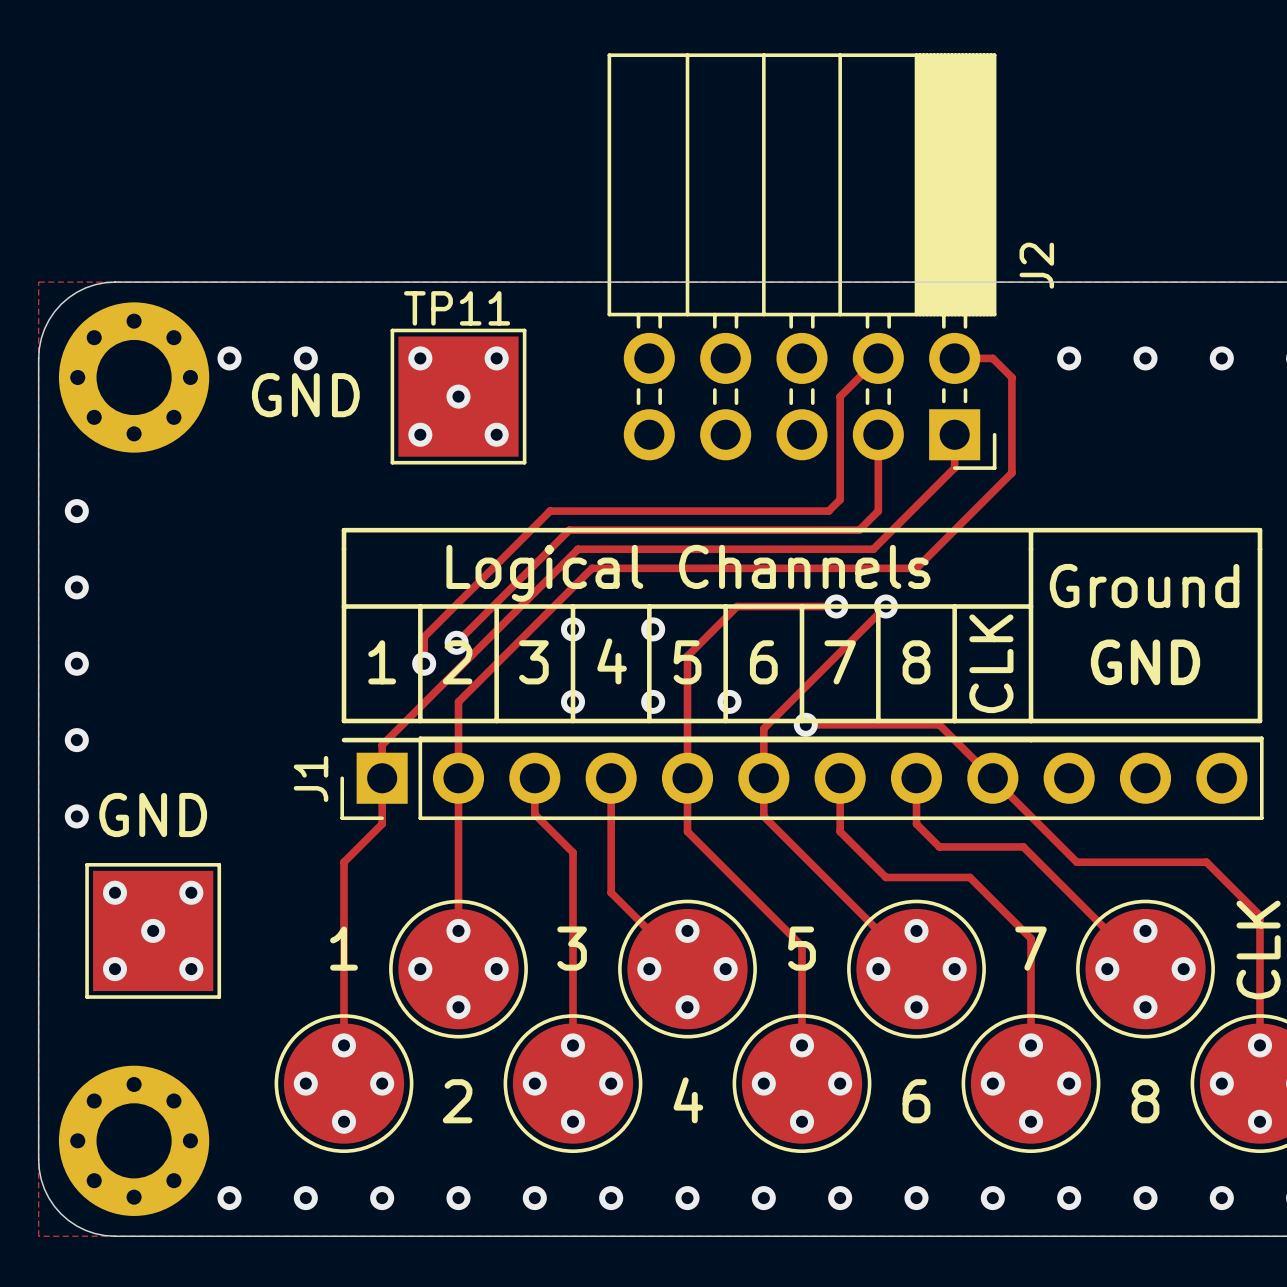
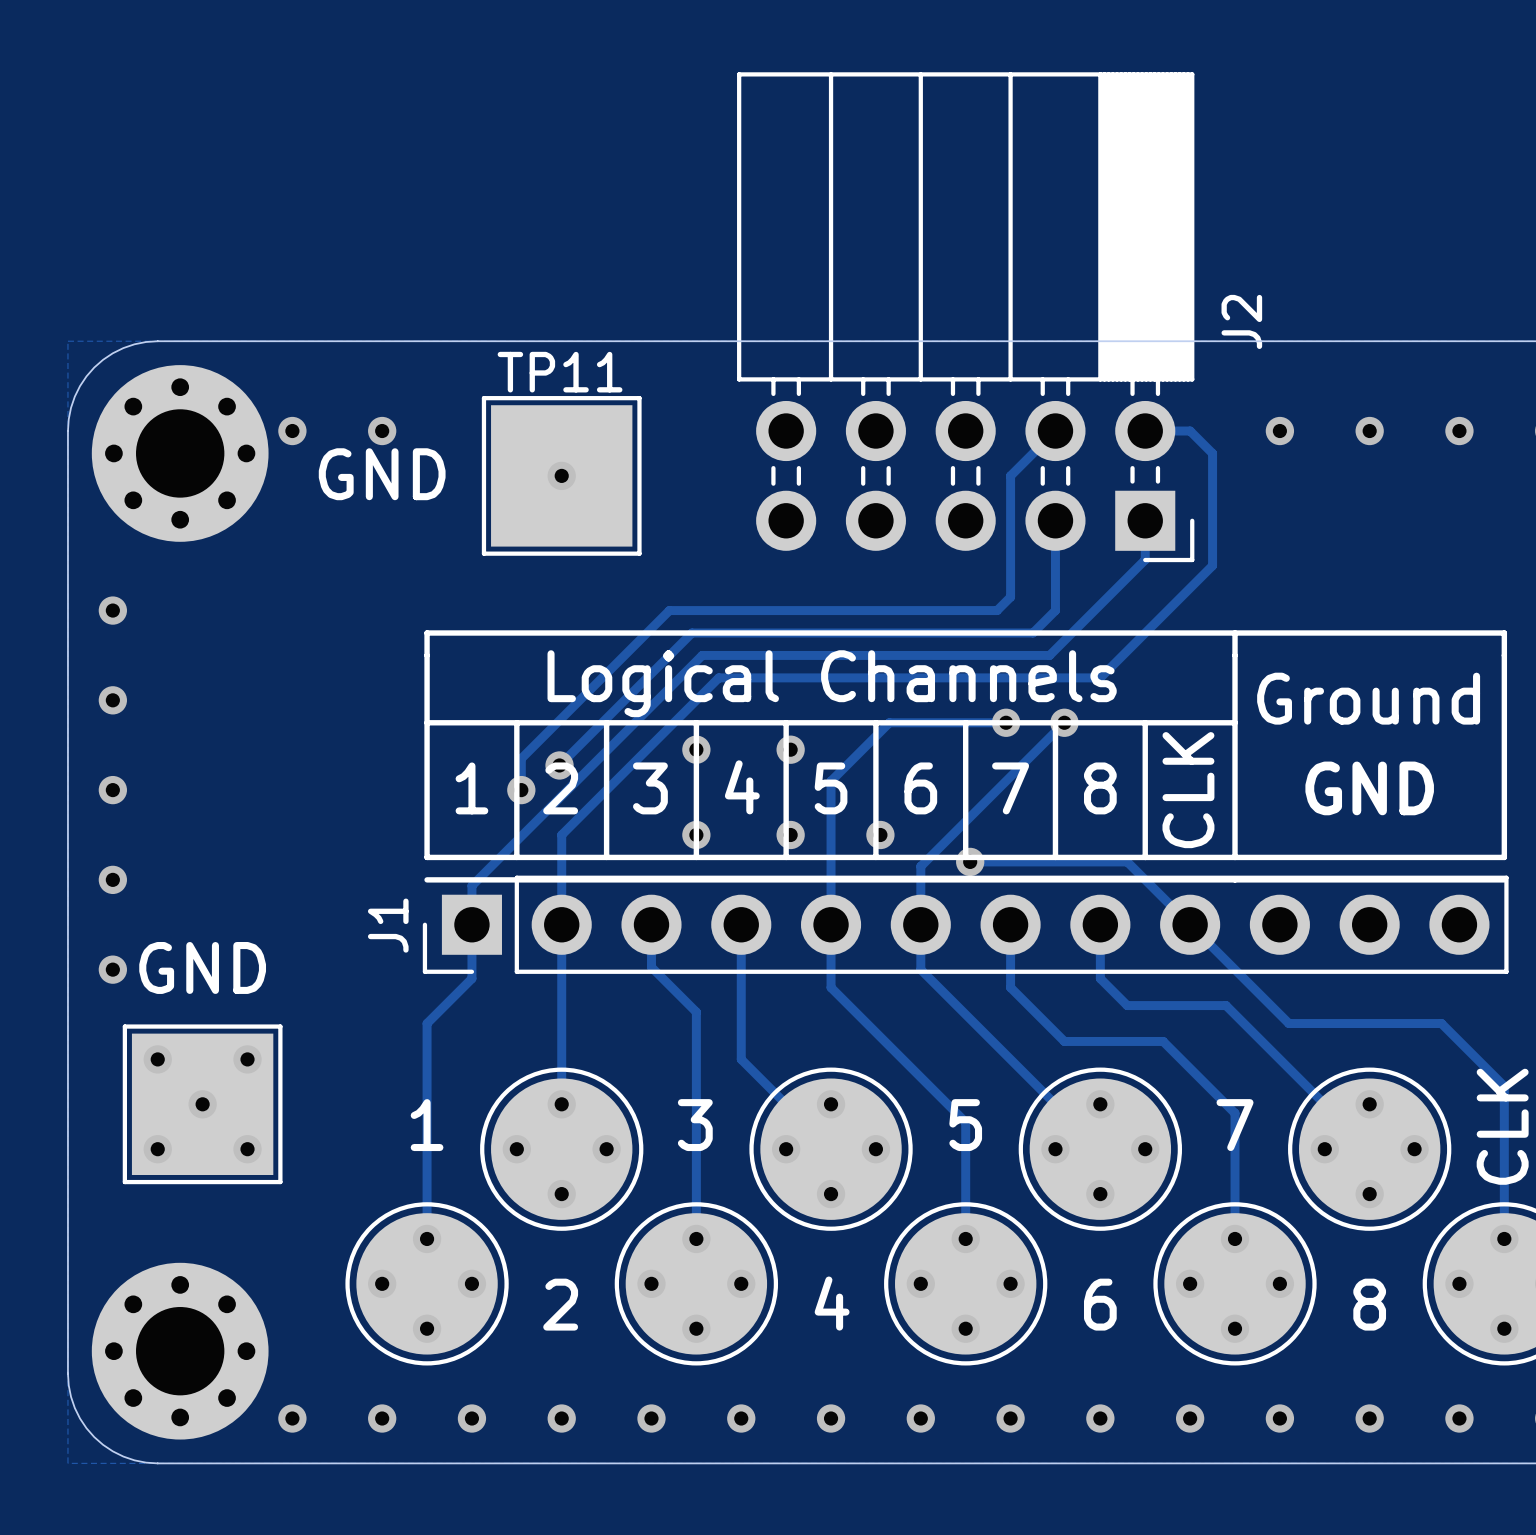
via: (420, 358) -> none
via: (496, 358) -> none
via: (420, 434) -> none
via: (496, 434) -> none

